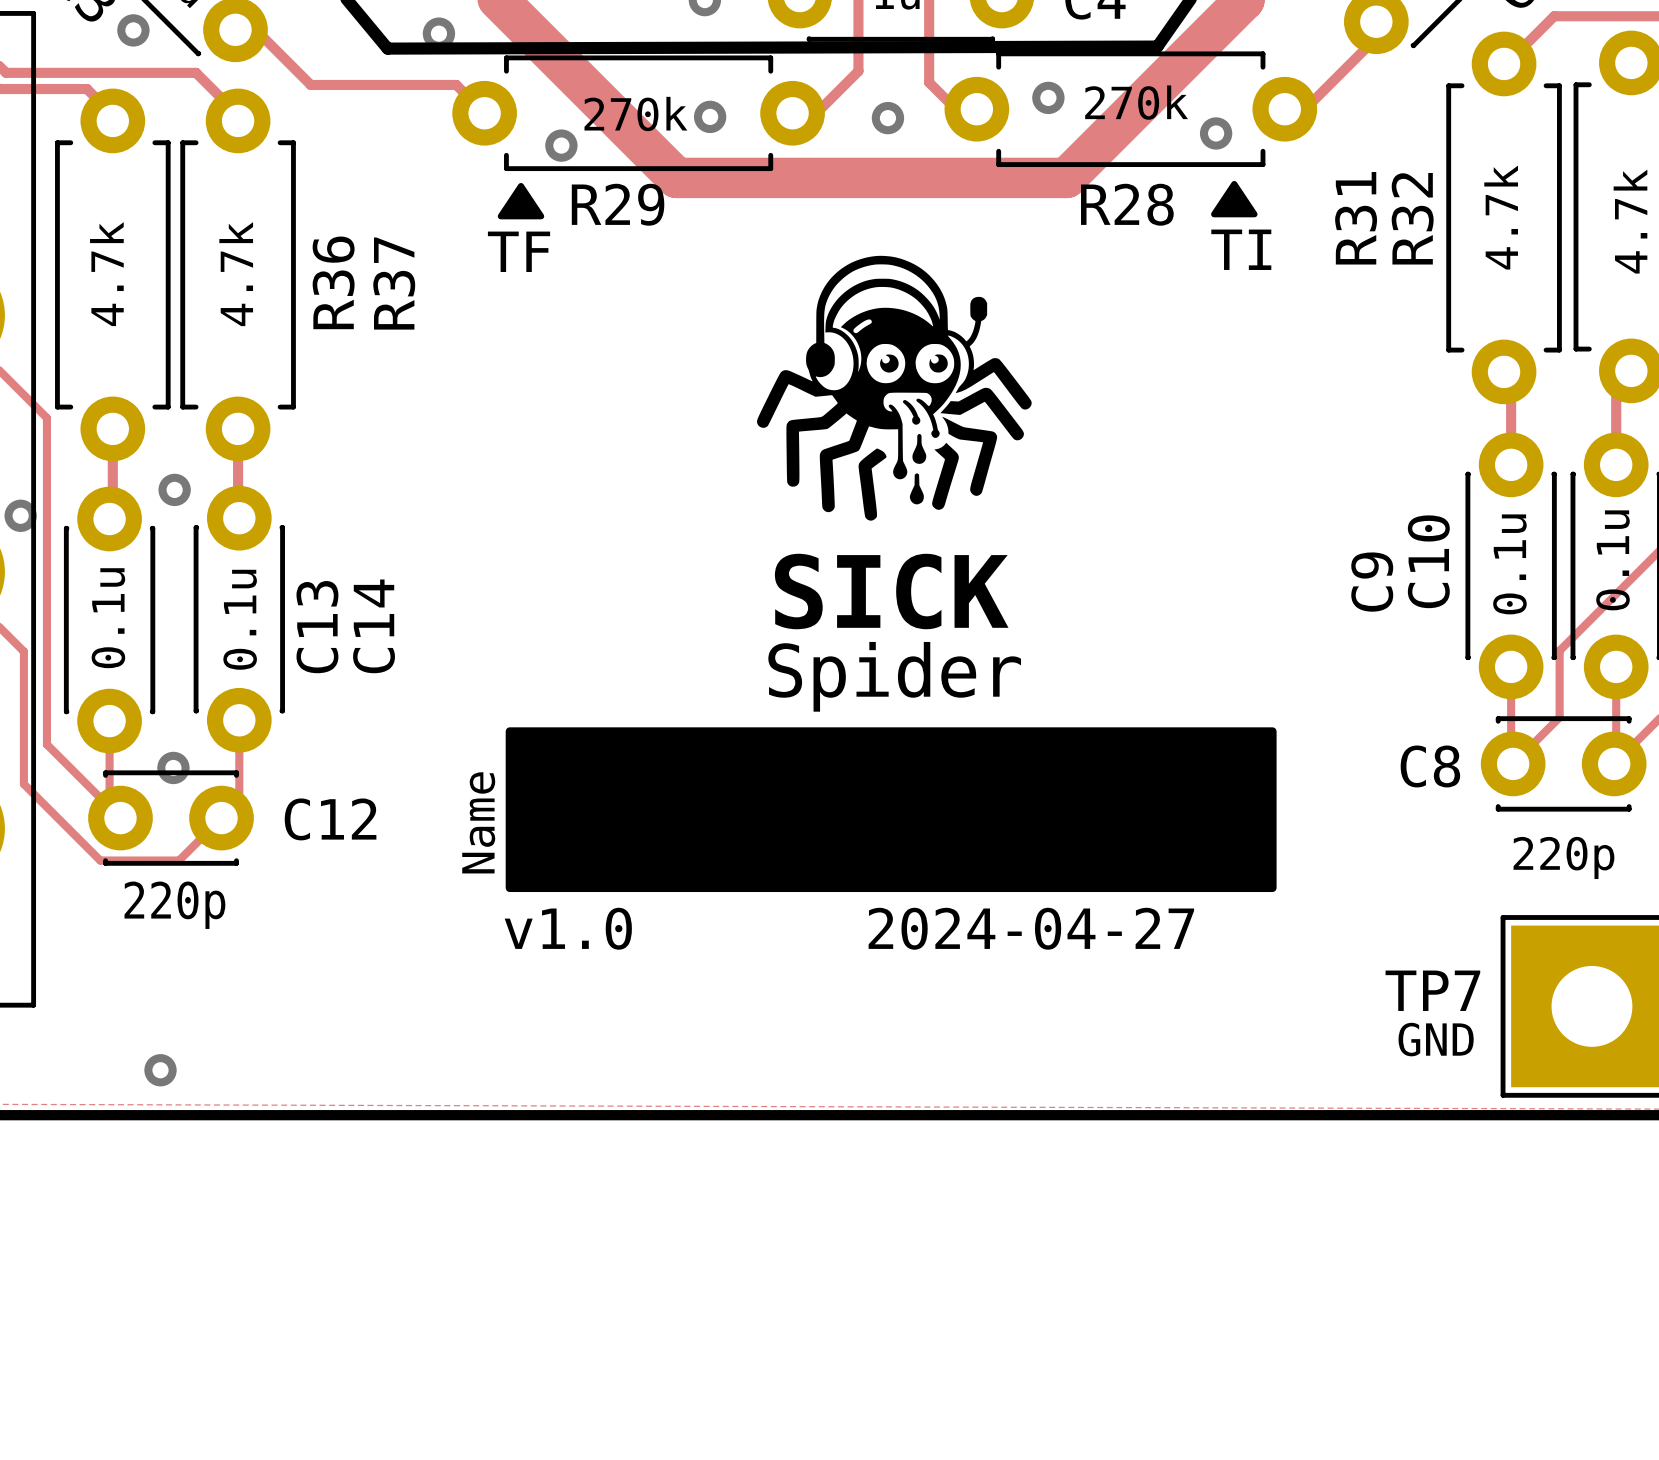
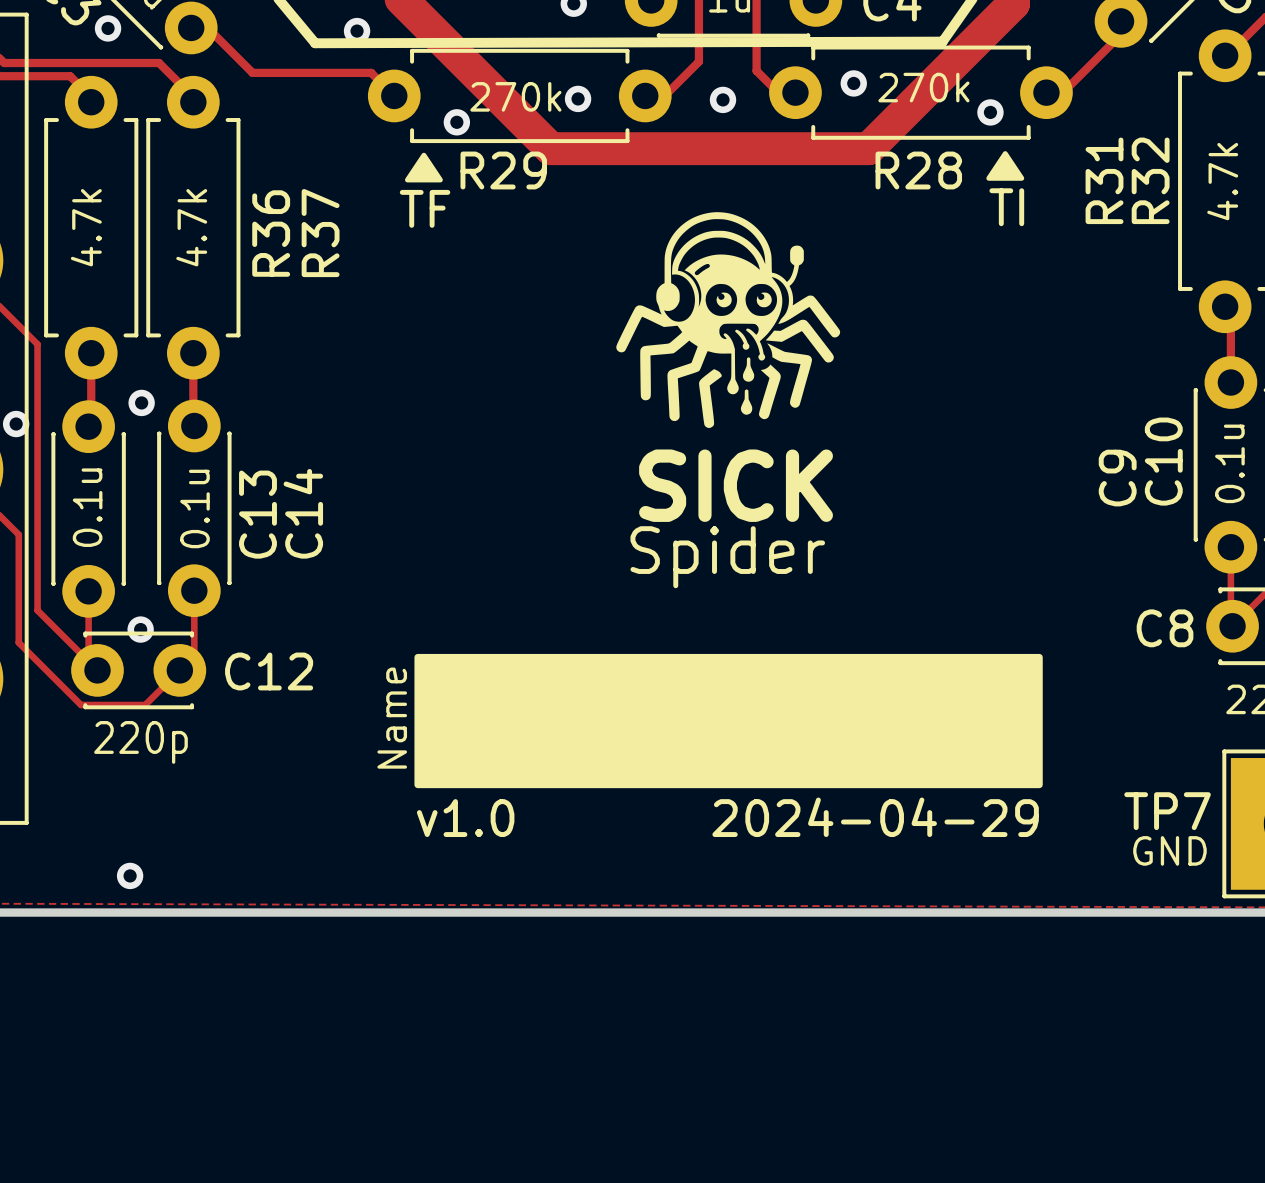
drawing position: (891, 809) -> (728, 721)
text: Name (478, 822) -> none
text: v1.0 (568, 928) -> Name (392, 718)
text: 2024-04-27 (1031, 928) -> 2024-04-29 (875, 817)
text: none -> v1.0 (465, 818)

